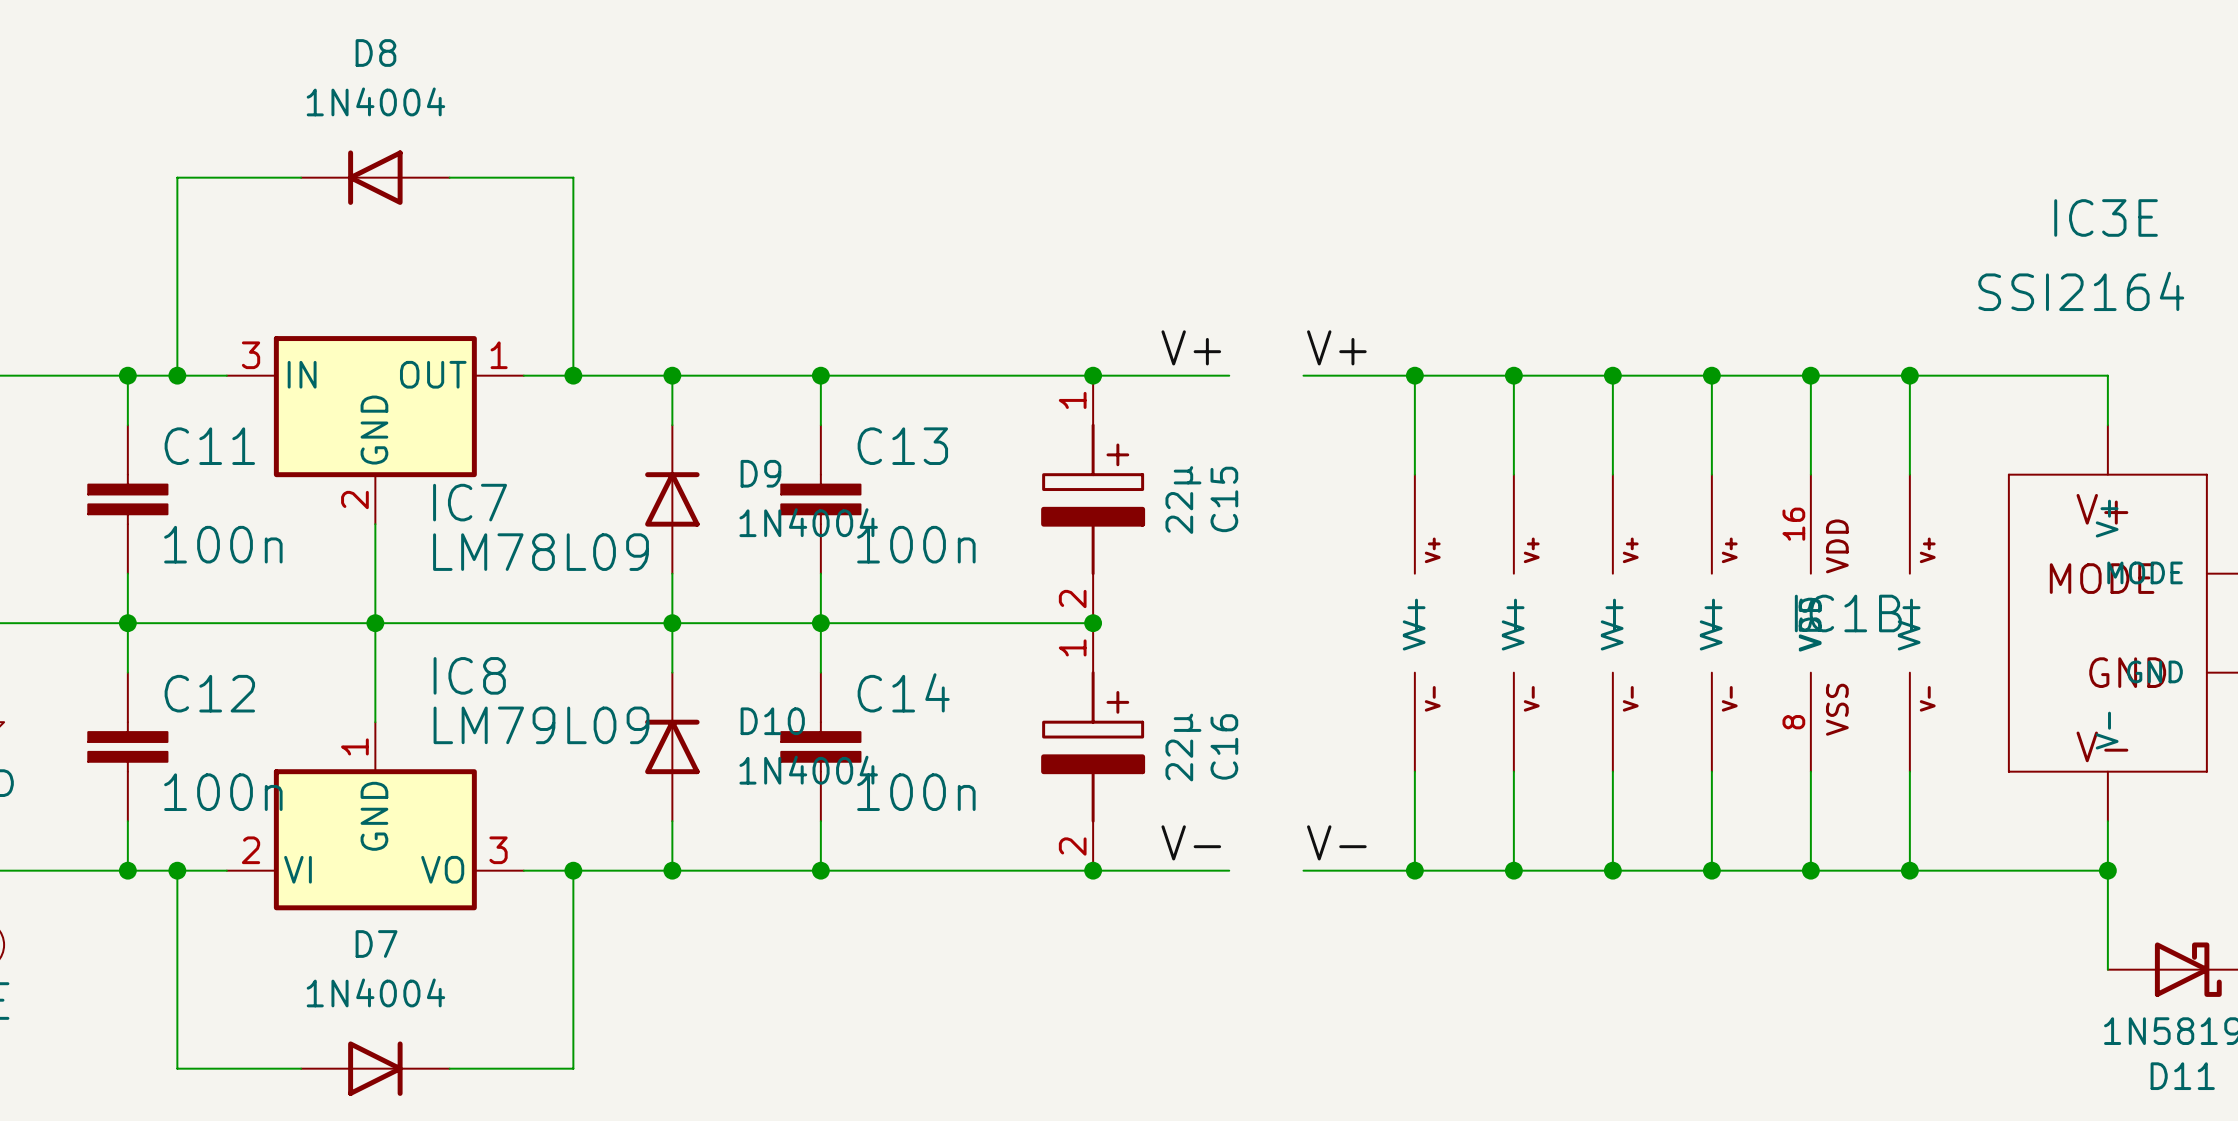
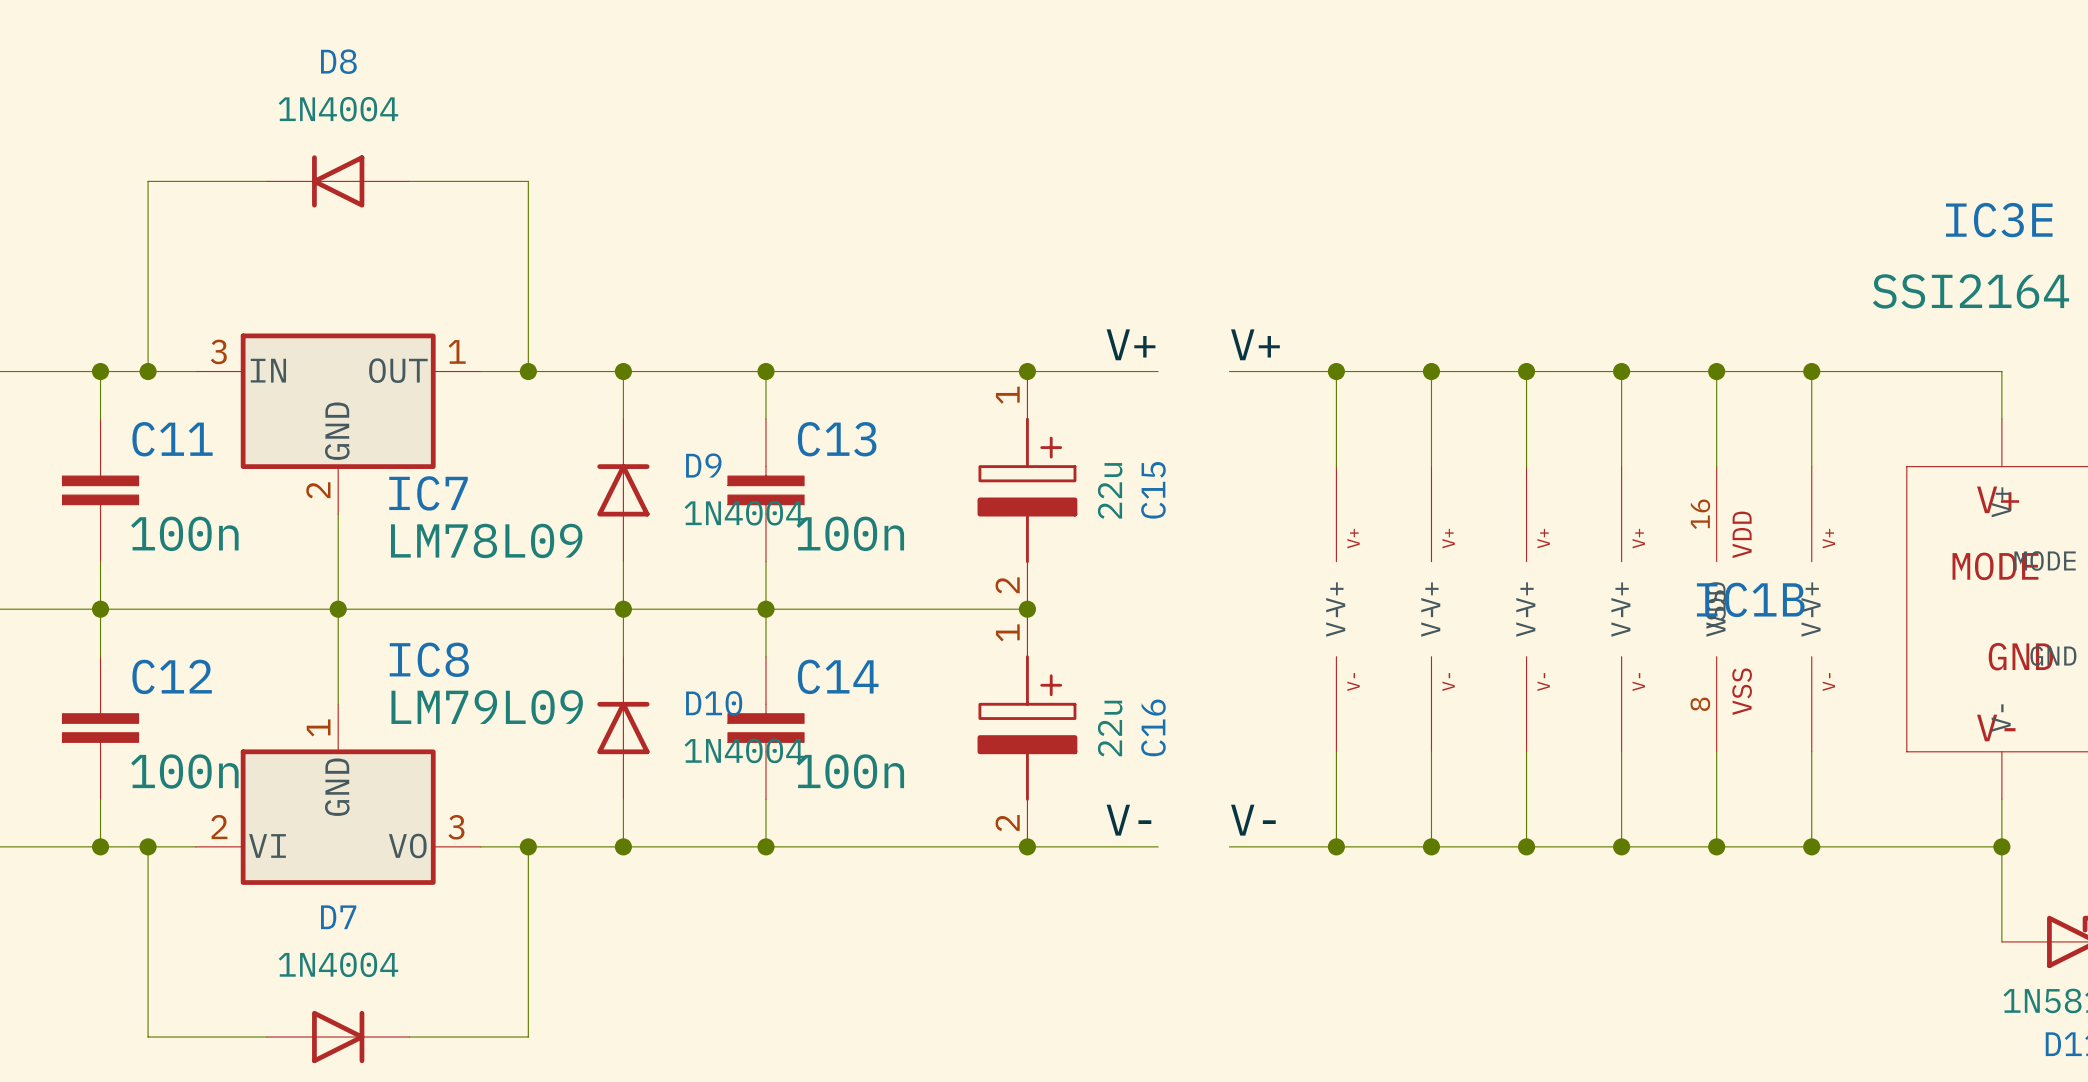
C15 value: 22µ (1183, 500) -> 22u (1110, 490)
C16 value: 22µ (1183, 747) -> 22u (1110, 728)

